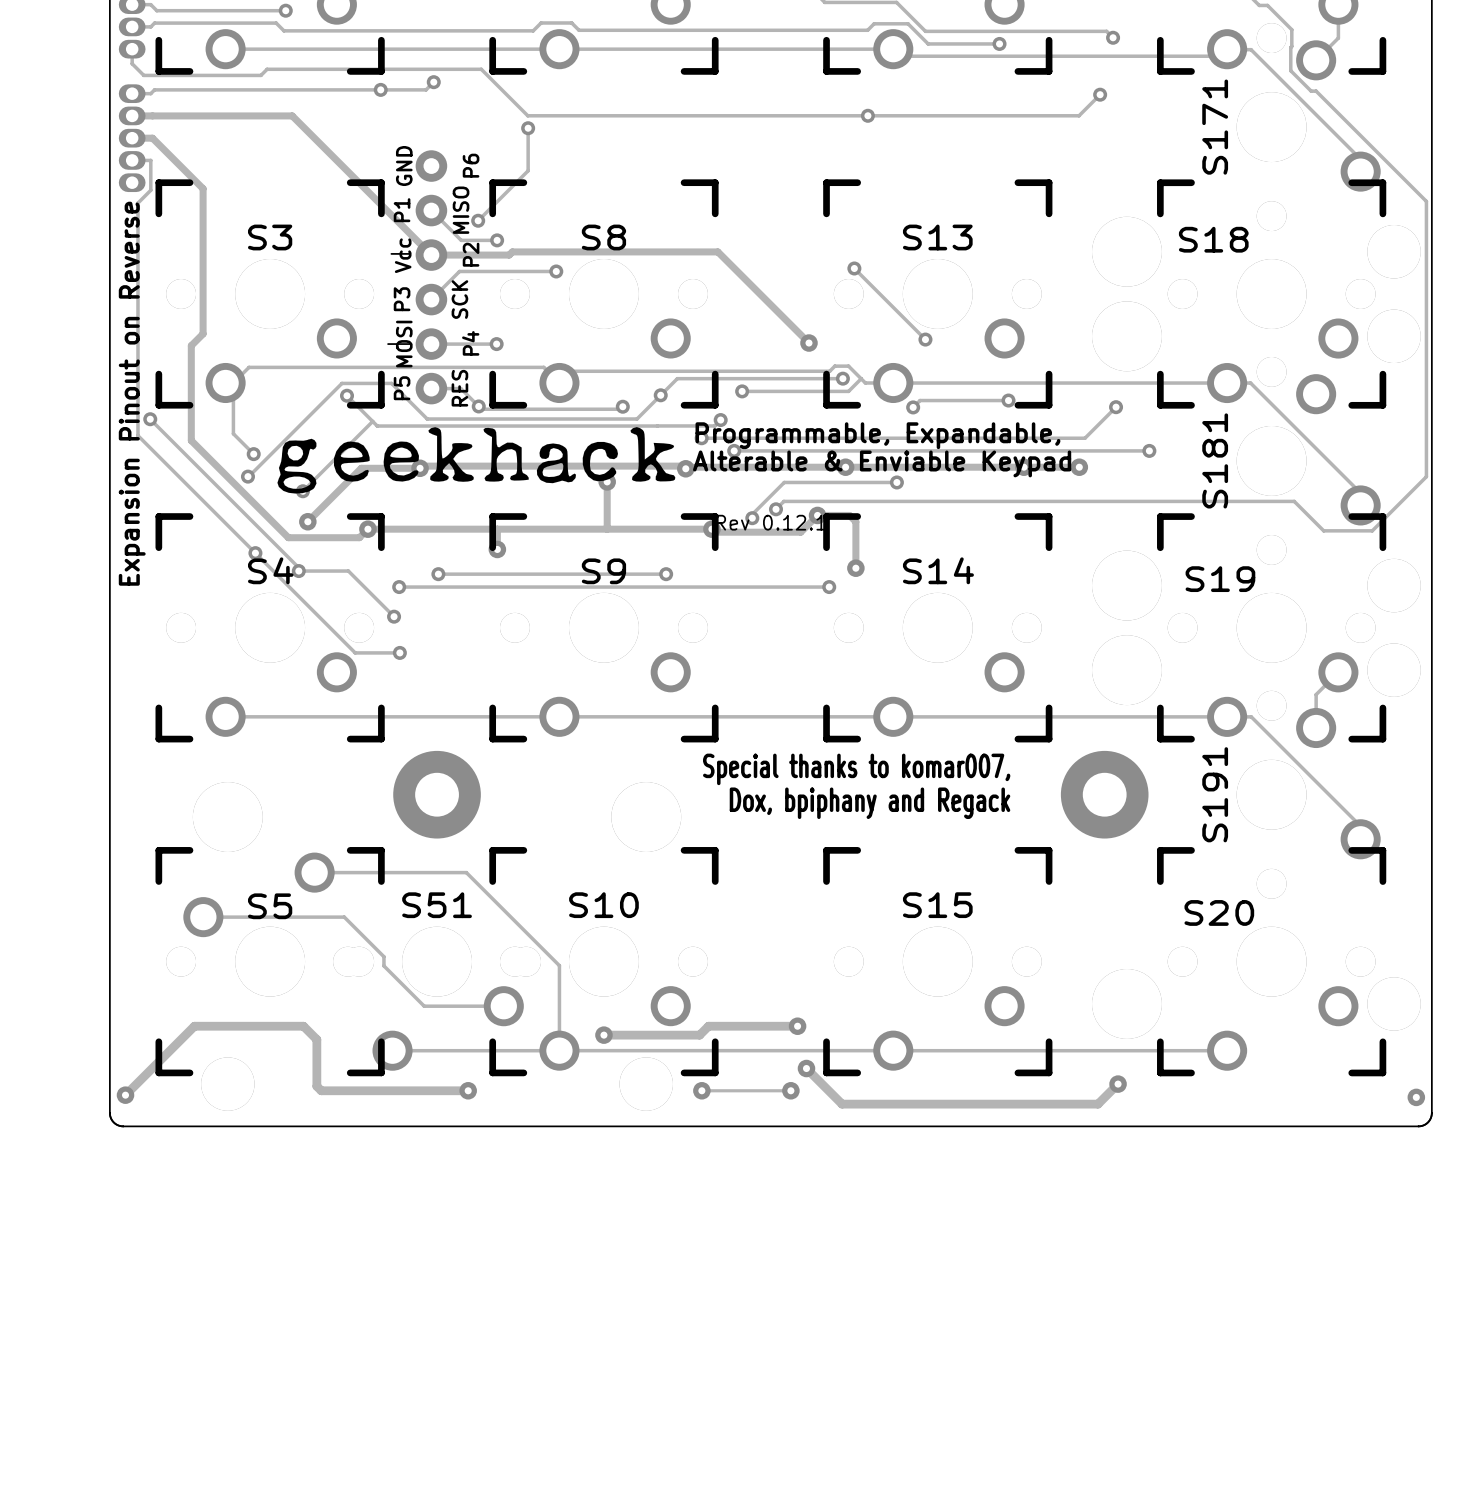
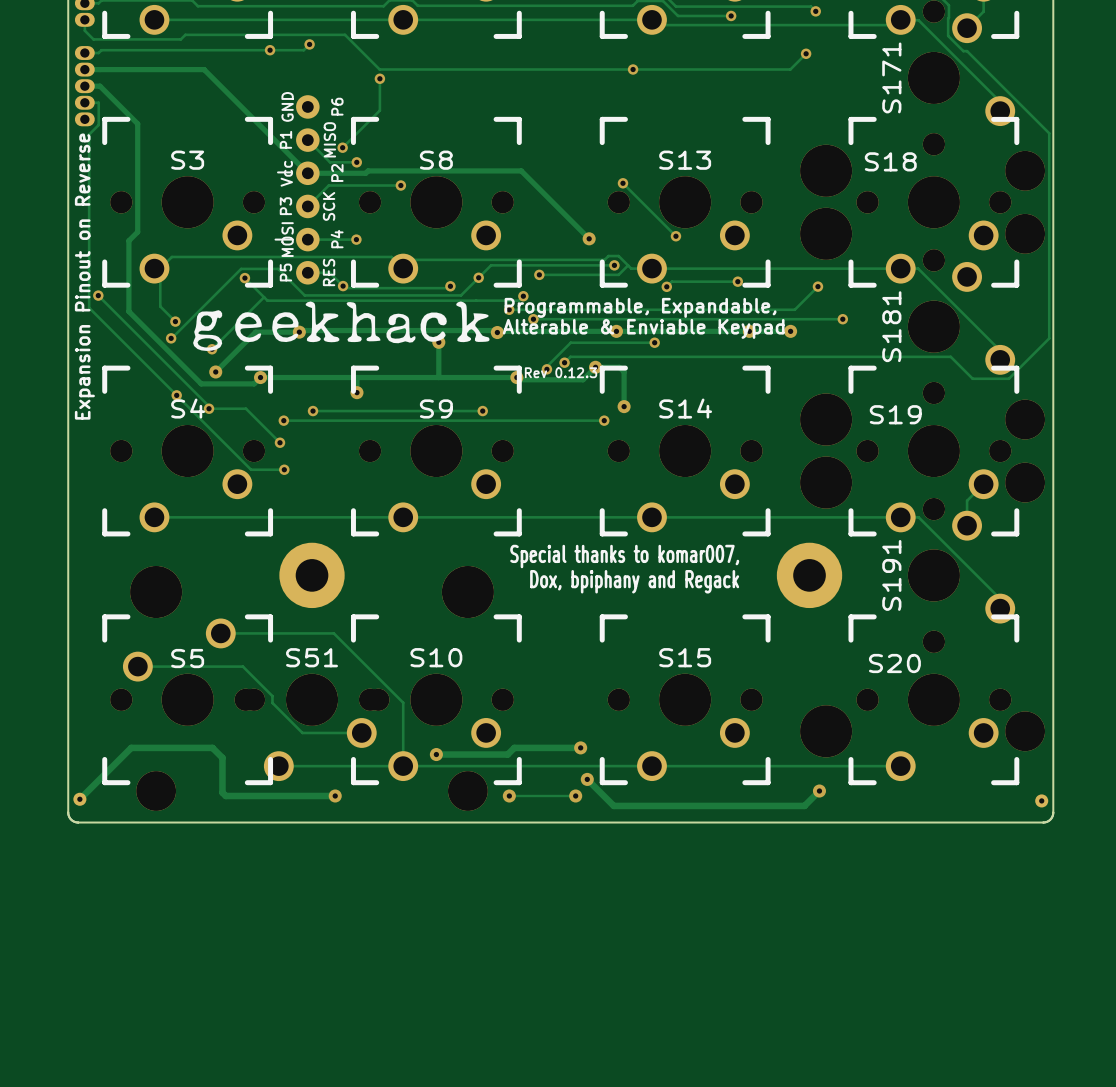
text: Rev 0.12.1 (771, 522) -> Rev 0.12.3 (561, 372)

